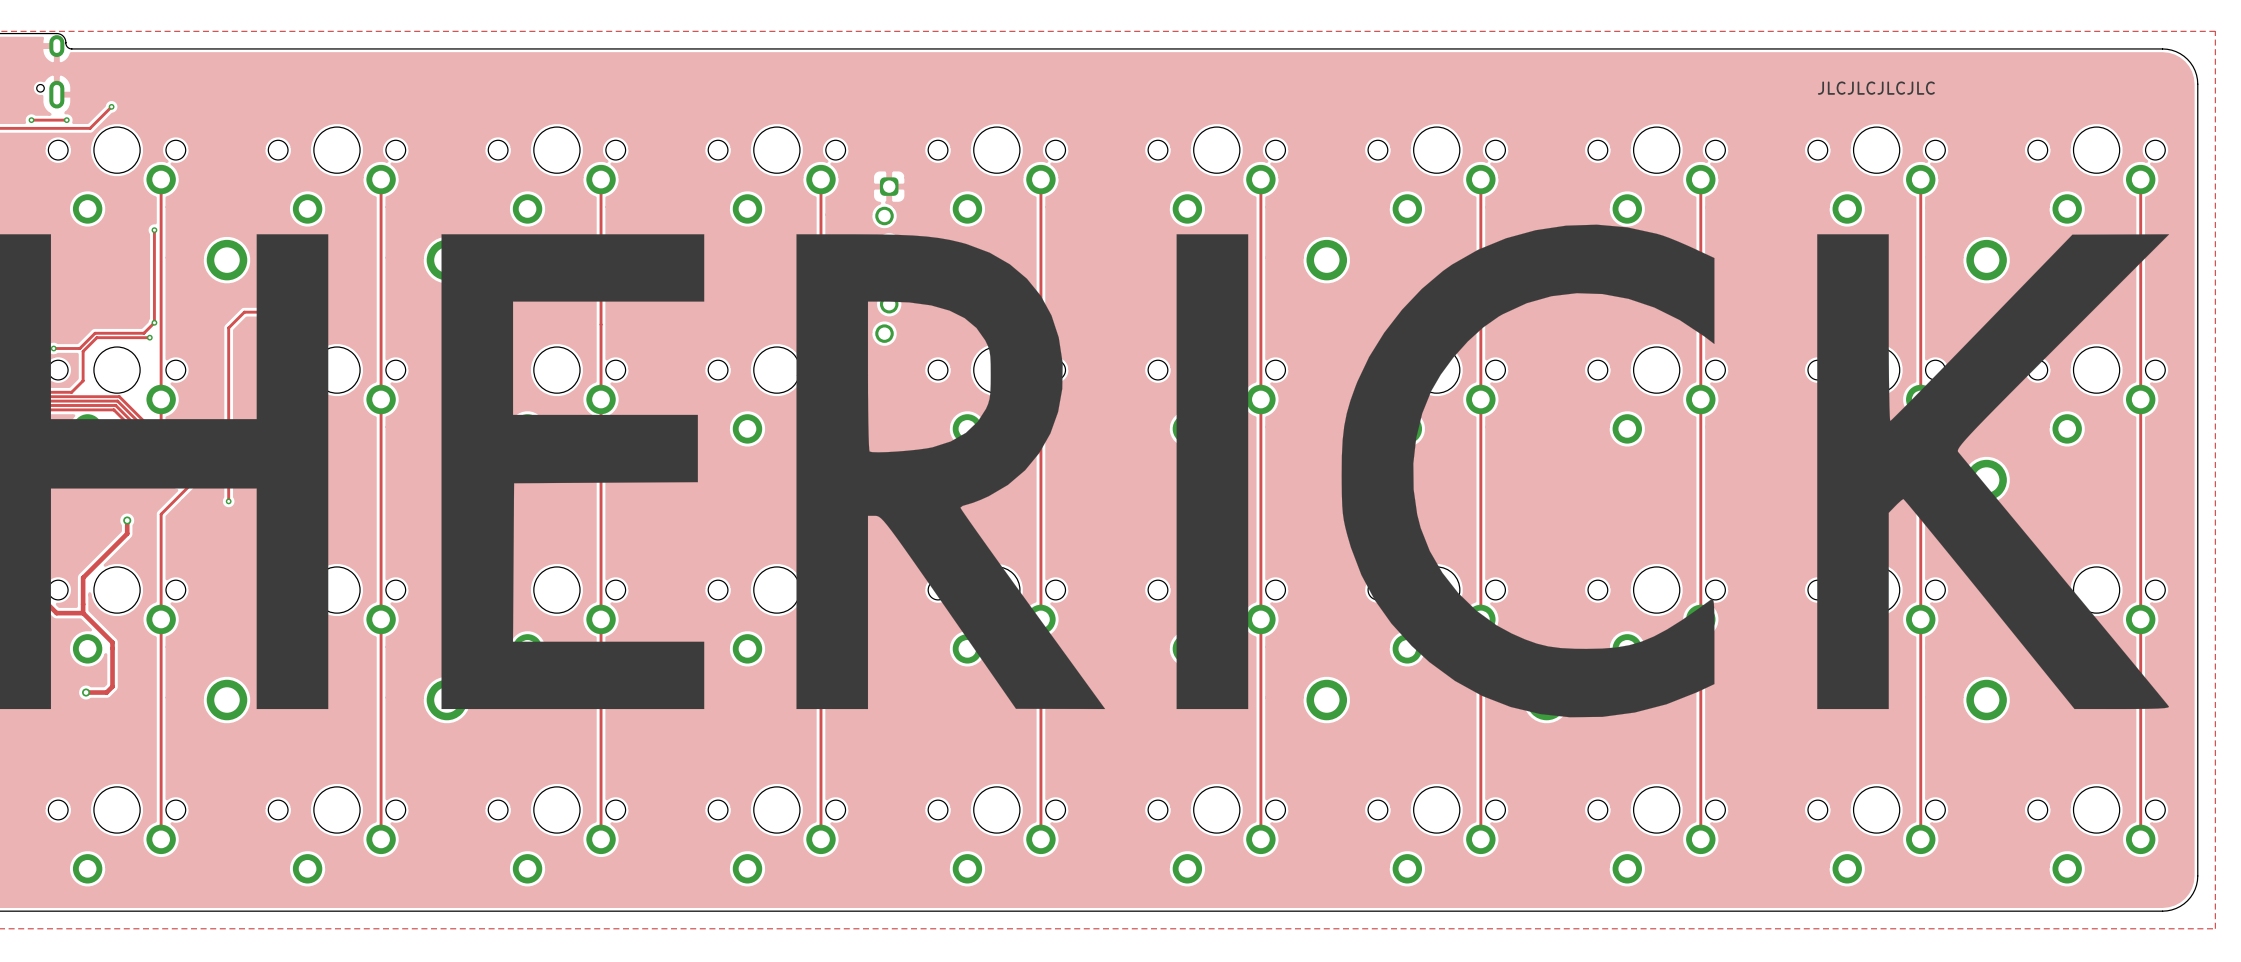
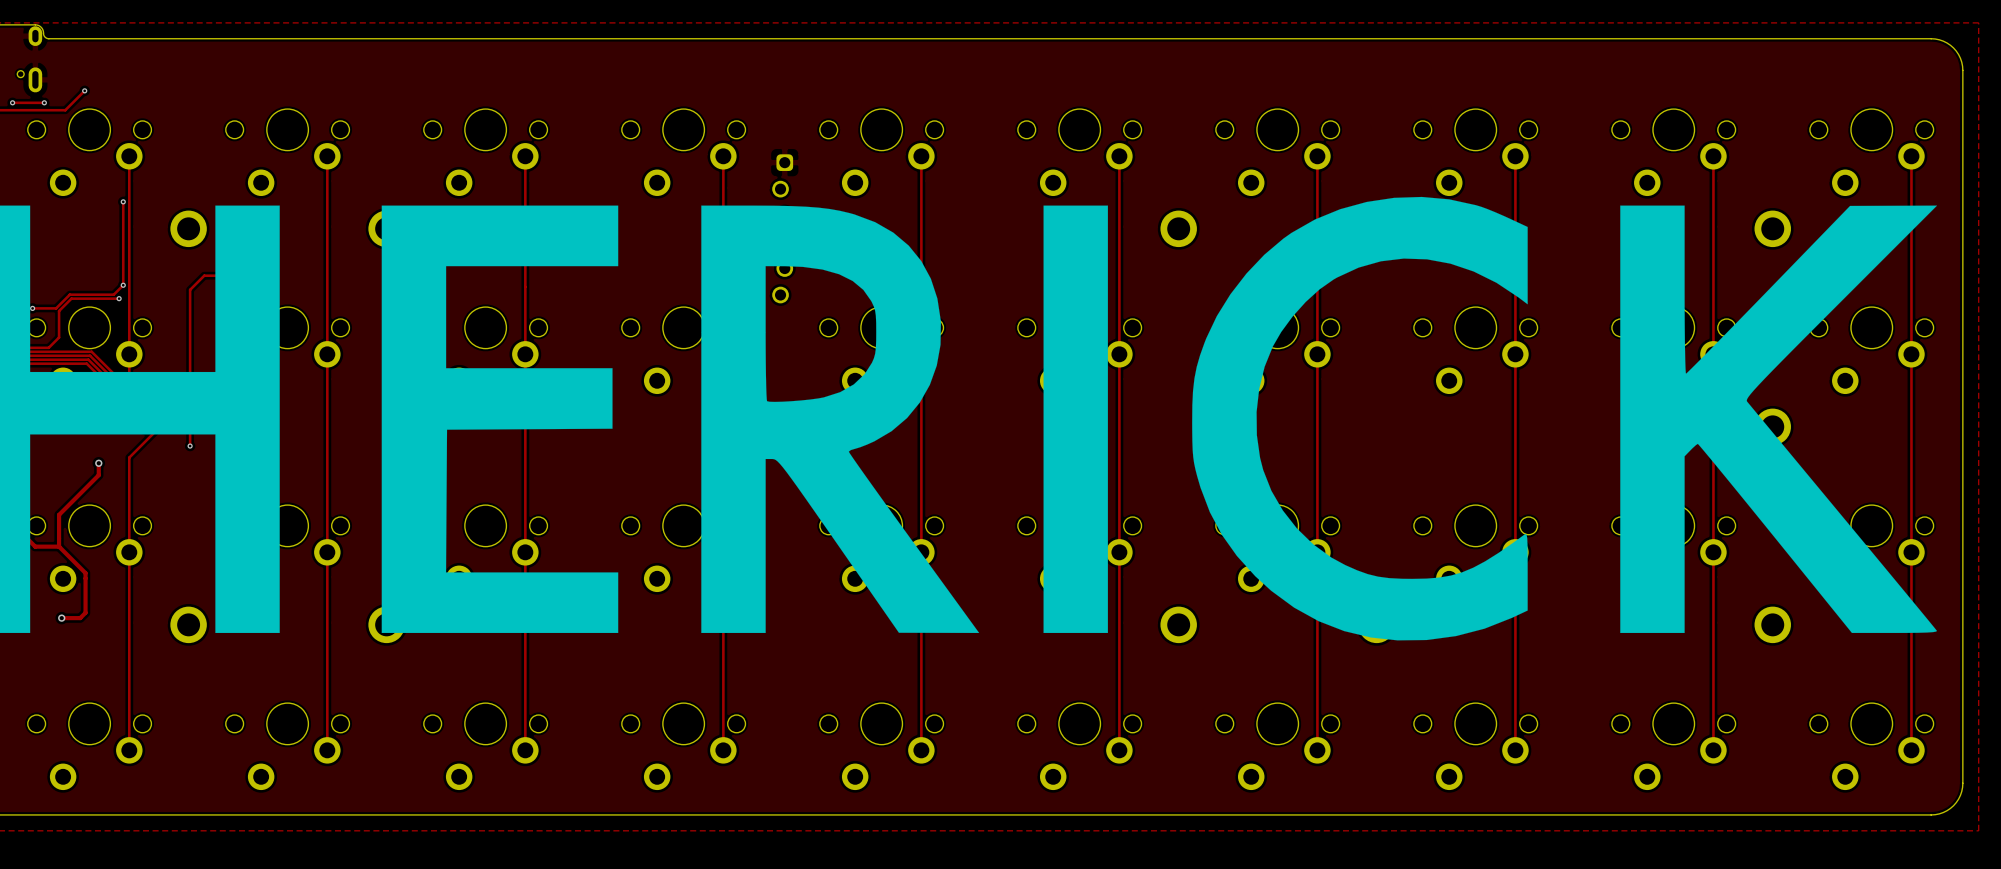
text: JLCJLCJLCJLC (1876, 88) -> none

